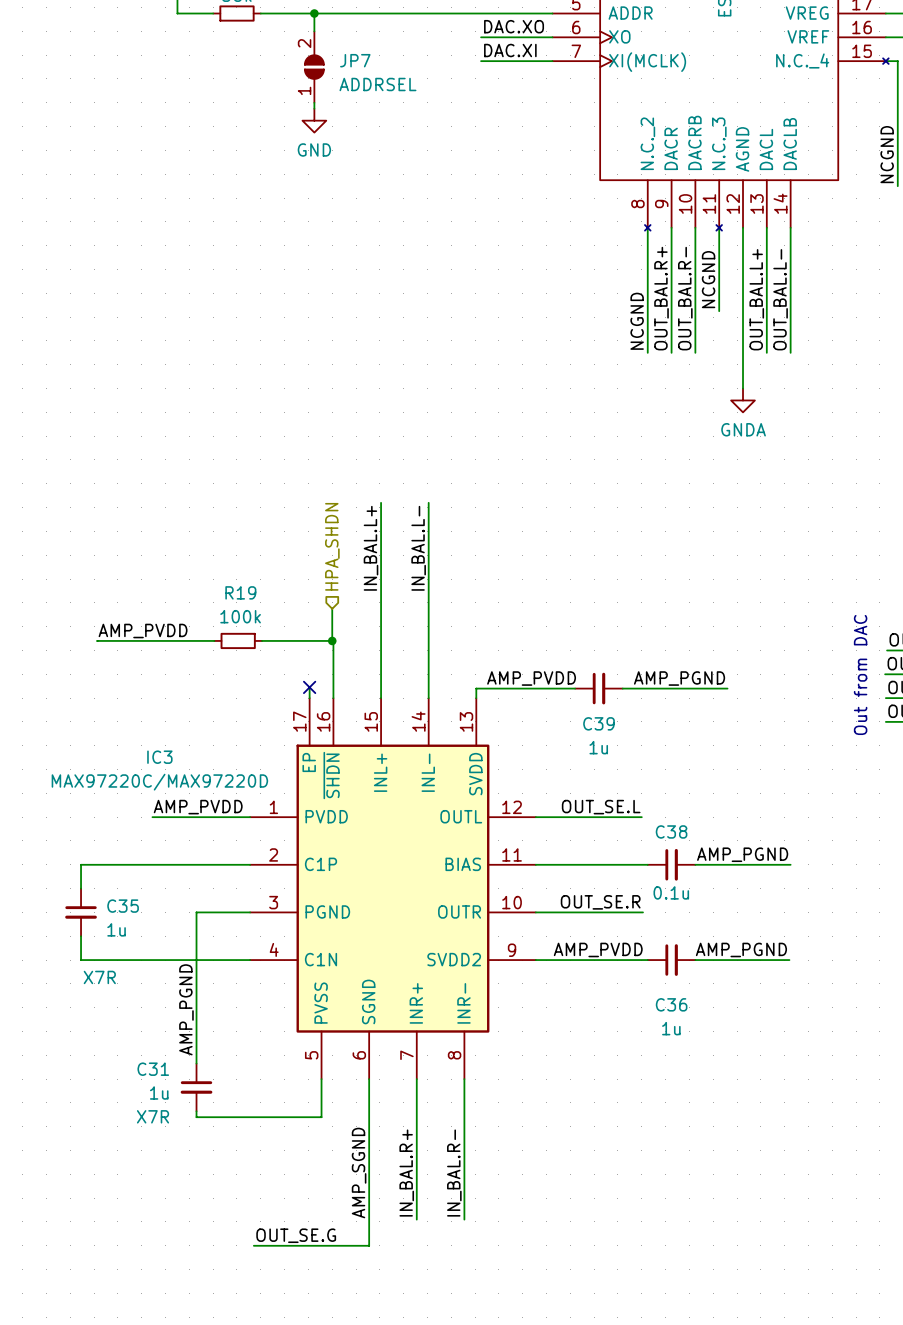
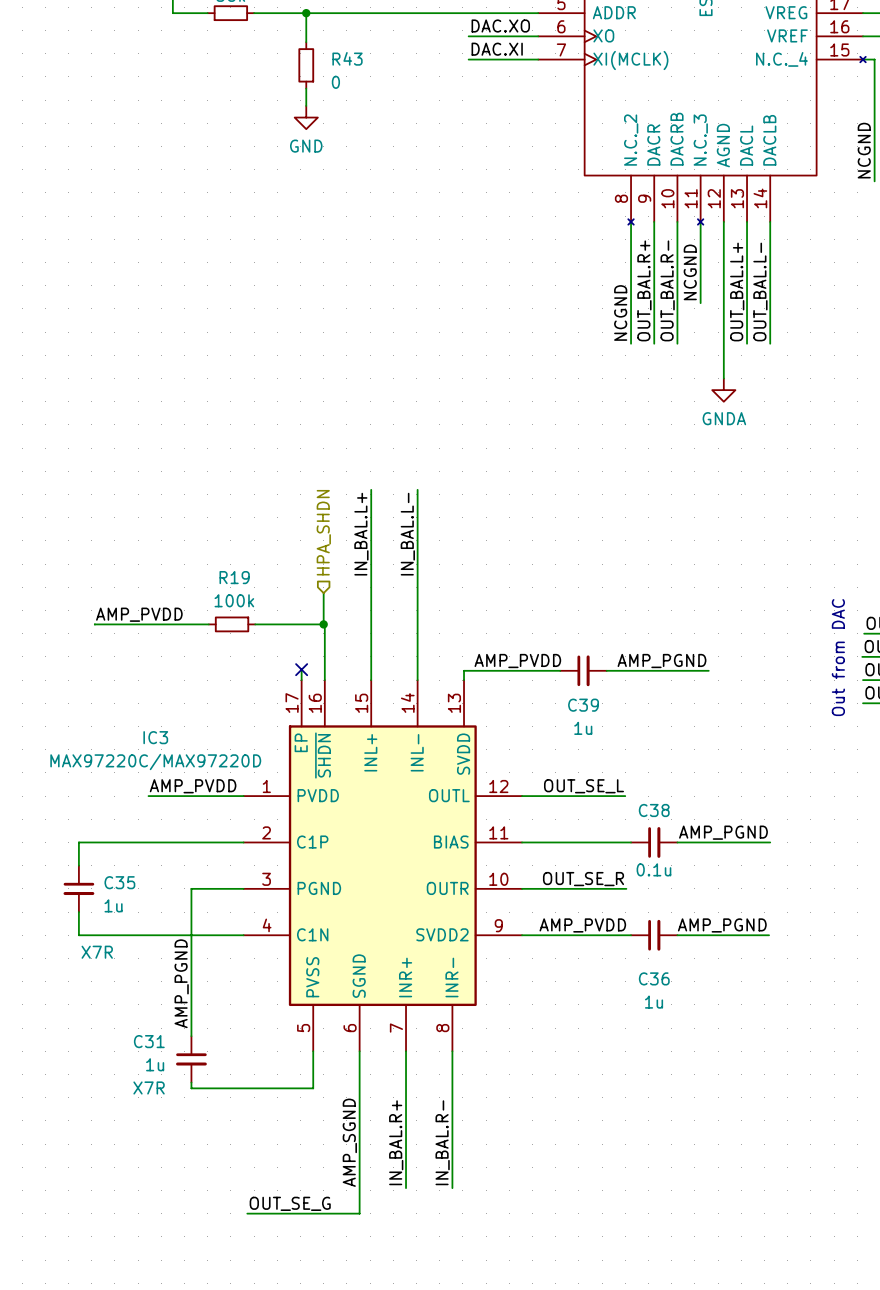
JP7: ADDRSEL (314, 67) -> none
R43: none -> 0 (306, 65)
label: OUT_SE.L (601, 807) -> OUT_SE_L (584, 786)
label: OUT_SE.R (600, 902) -> OUT_SE_R (583, 879)
label: OUT_SE.G (296, 1235) -> OUT_SE_G (290, 1203)

